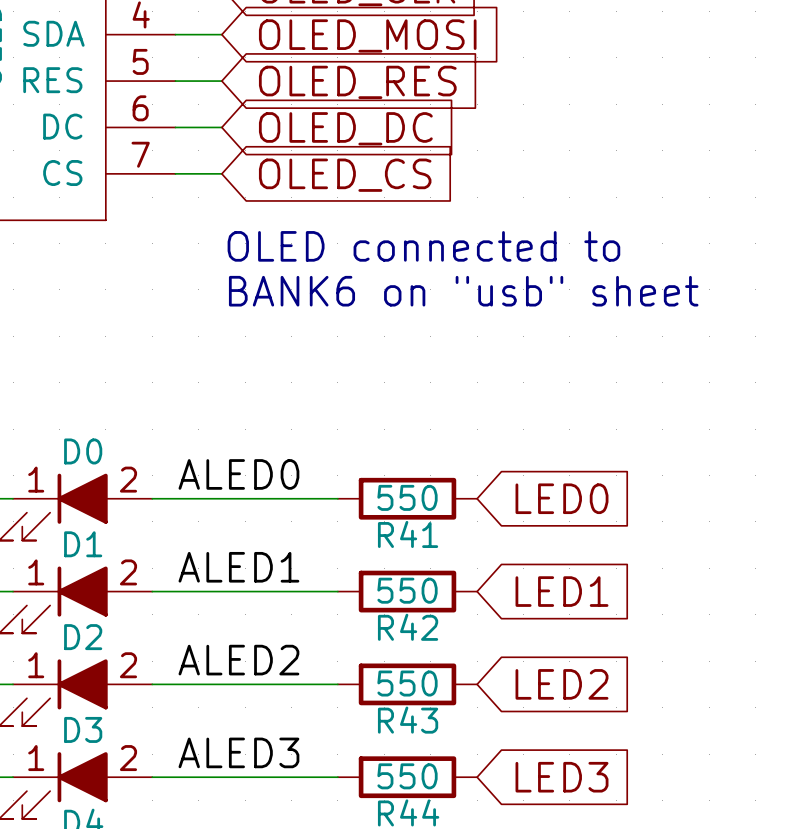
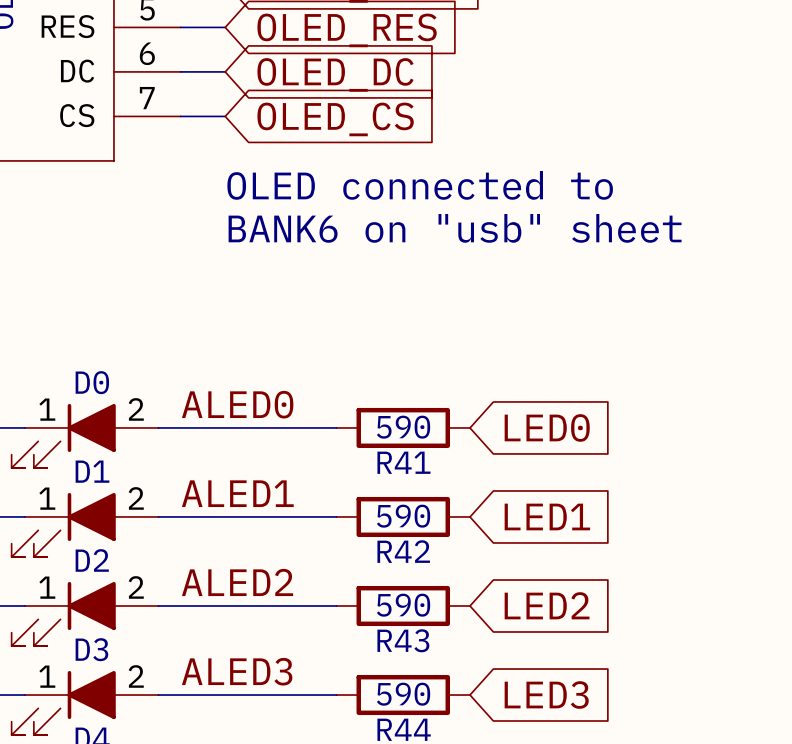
R41 value: 550 (407, 497) -> 590 (403, 427)
R42 value: 550 (407, 590) -> 590 (403, 516)
R43 value: 550 (407, 683) -> 590 (403, 605)
R44 value: 550 (407, 776) -> 590 (403, 694)

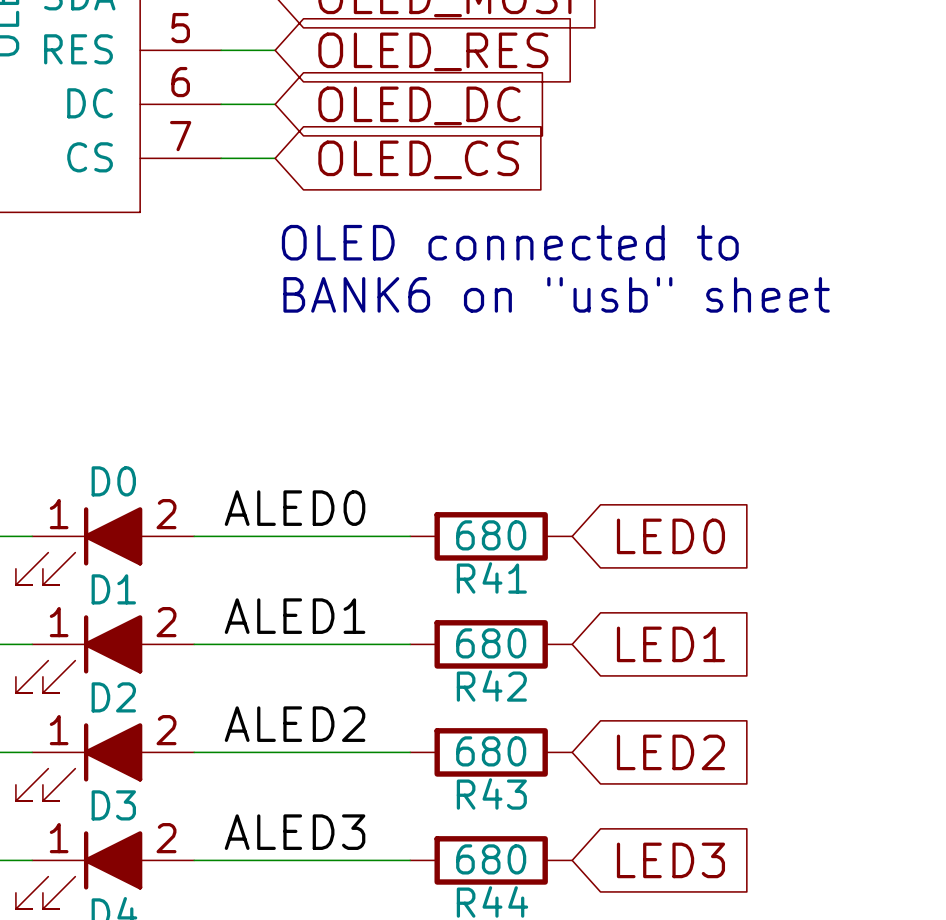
R41 value: 590 (403, 427) -> 680 (491, 535)
R42 value: 590 (403, 516) -> 680 (491, 643)
R43 value: 590 (403, 605) -> 680 (491, 751)
R44 value: 590 (403, 694) -> 680 (491, 859)

